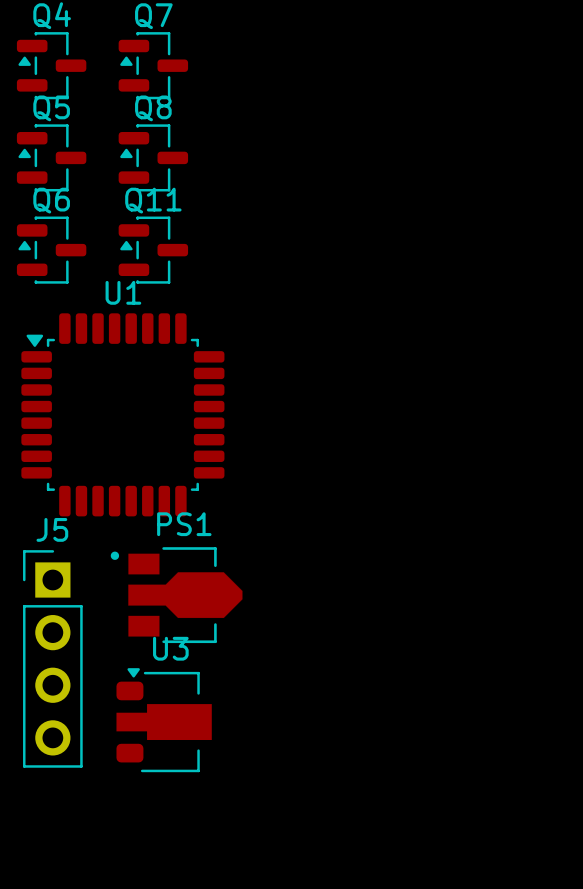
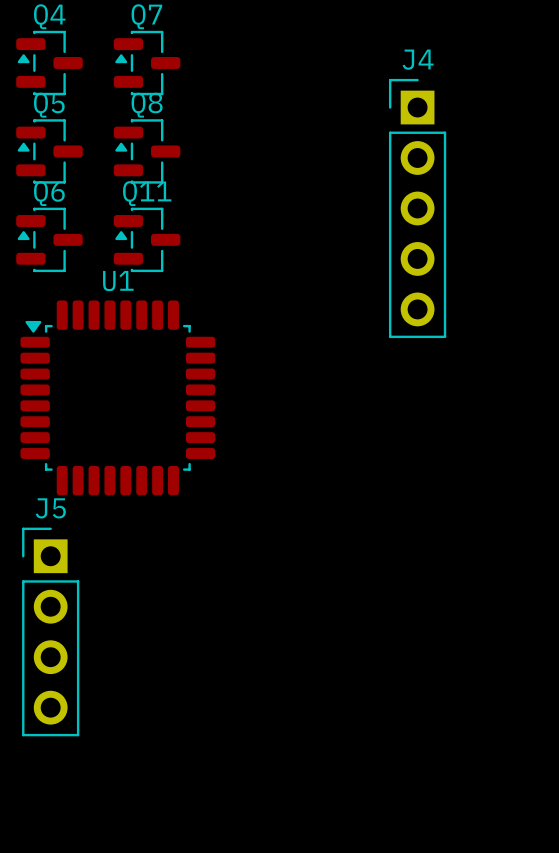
J4: none -> (417, 208)
PS1: (176, 595) -> none
U3: (164, 720) -> none

